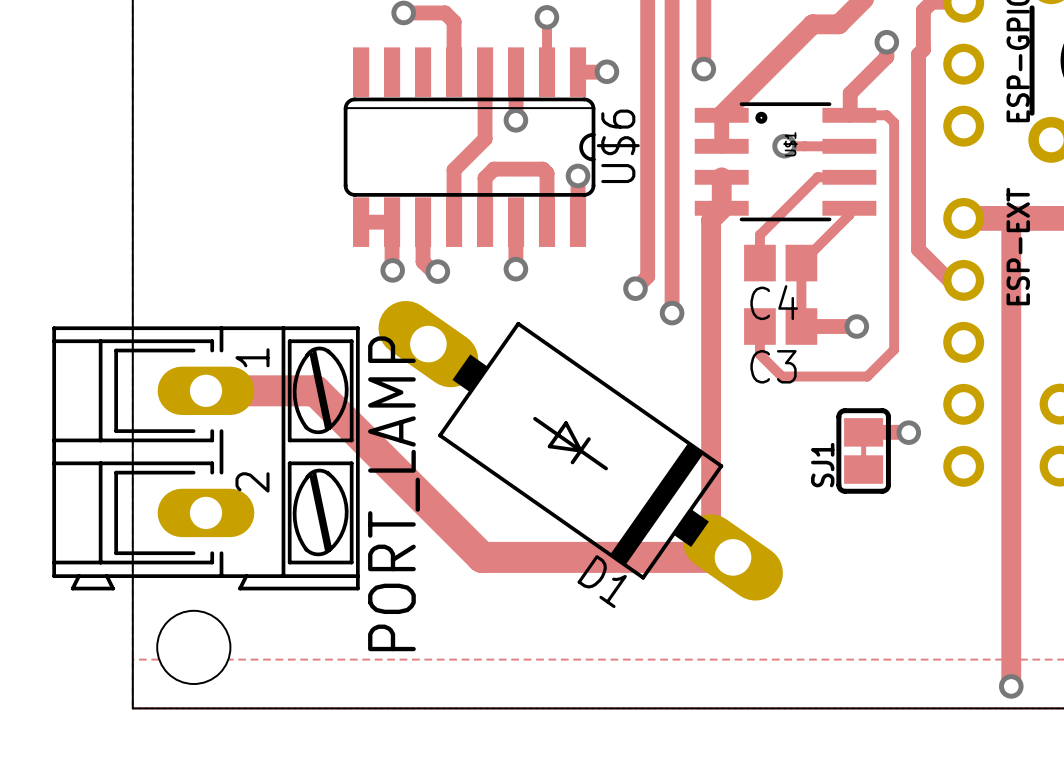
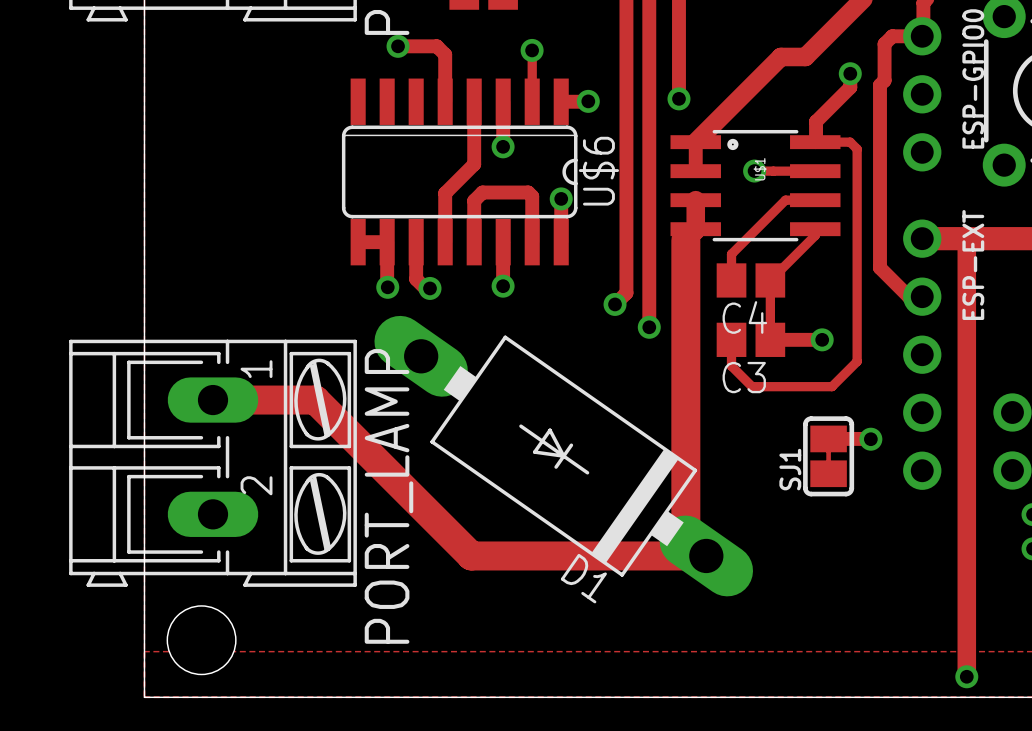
track width: thin (711, 220) (711, 542) (733, 557) -> thick (685, 240) (685, 542) (706, 555)

